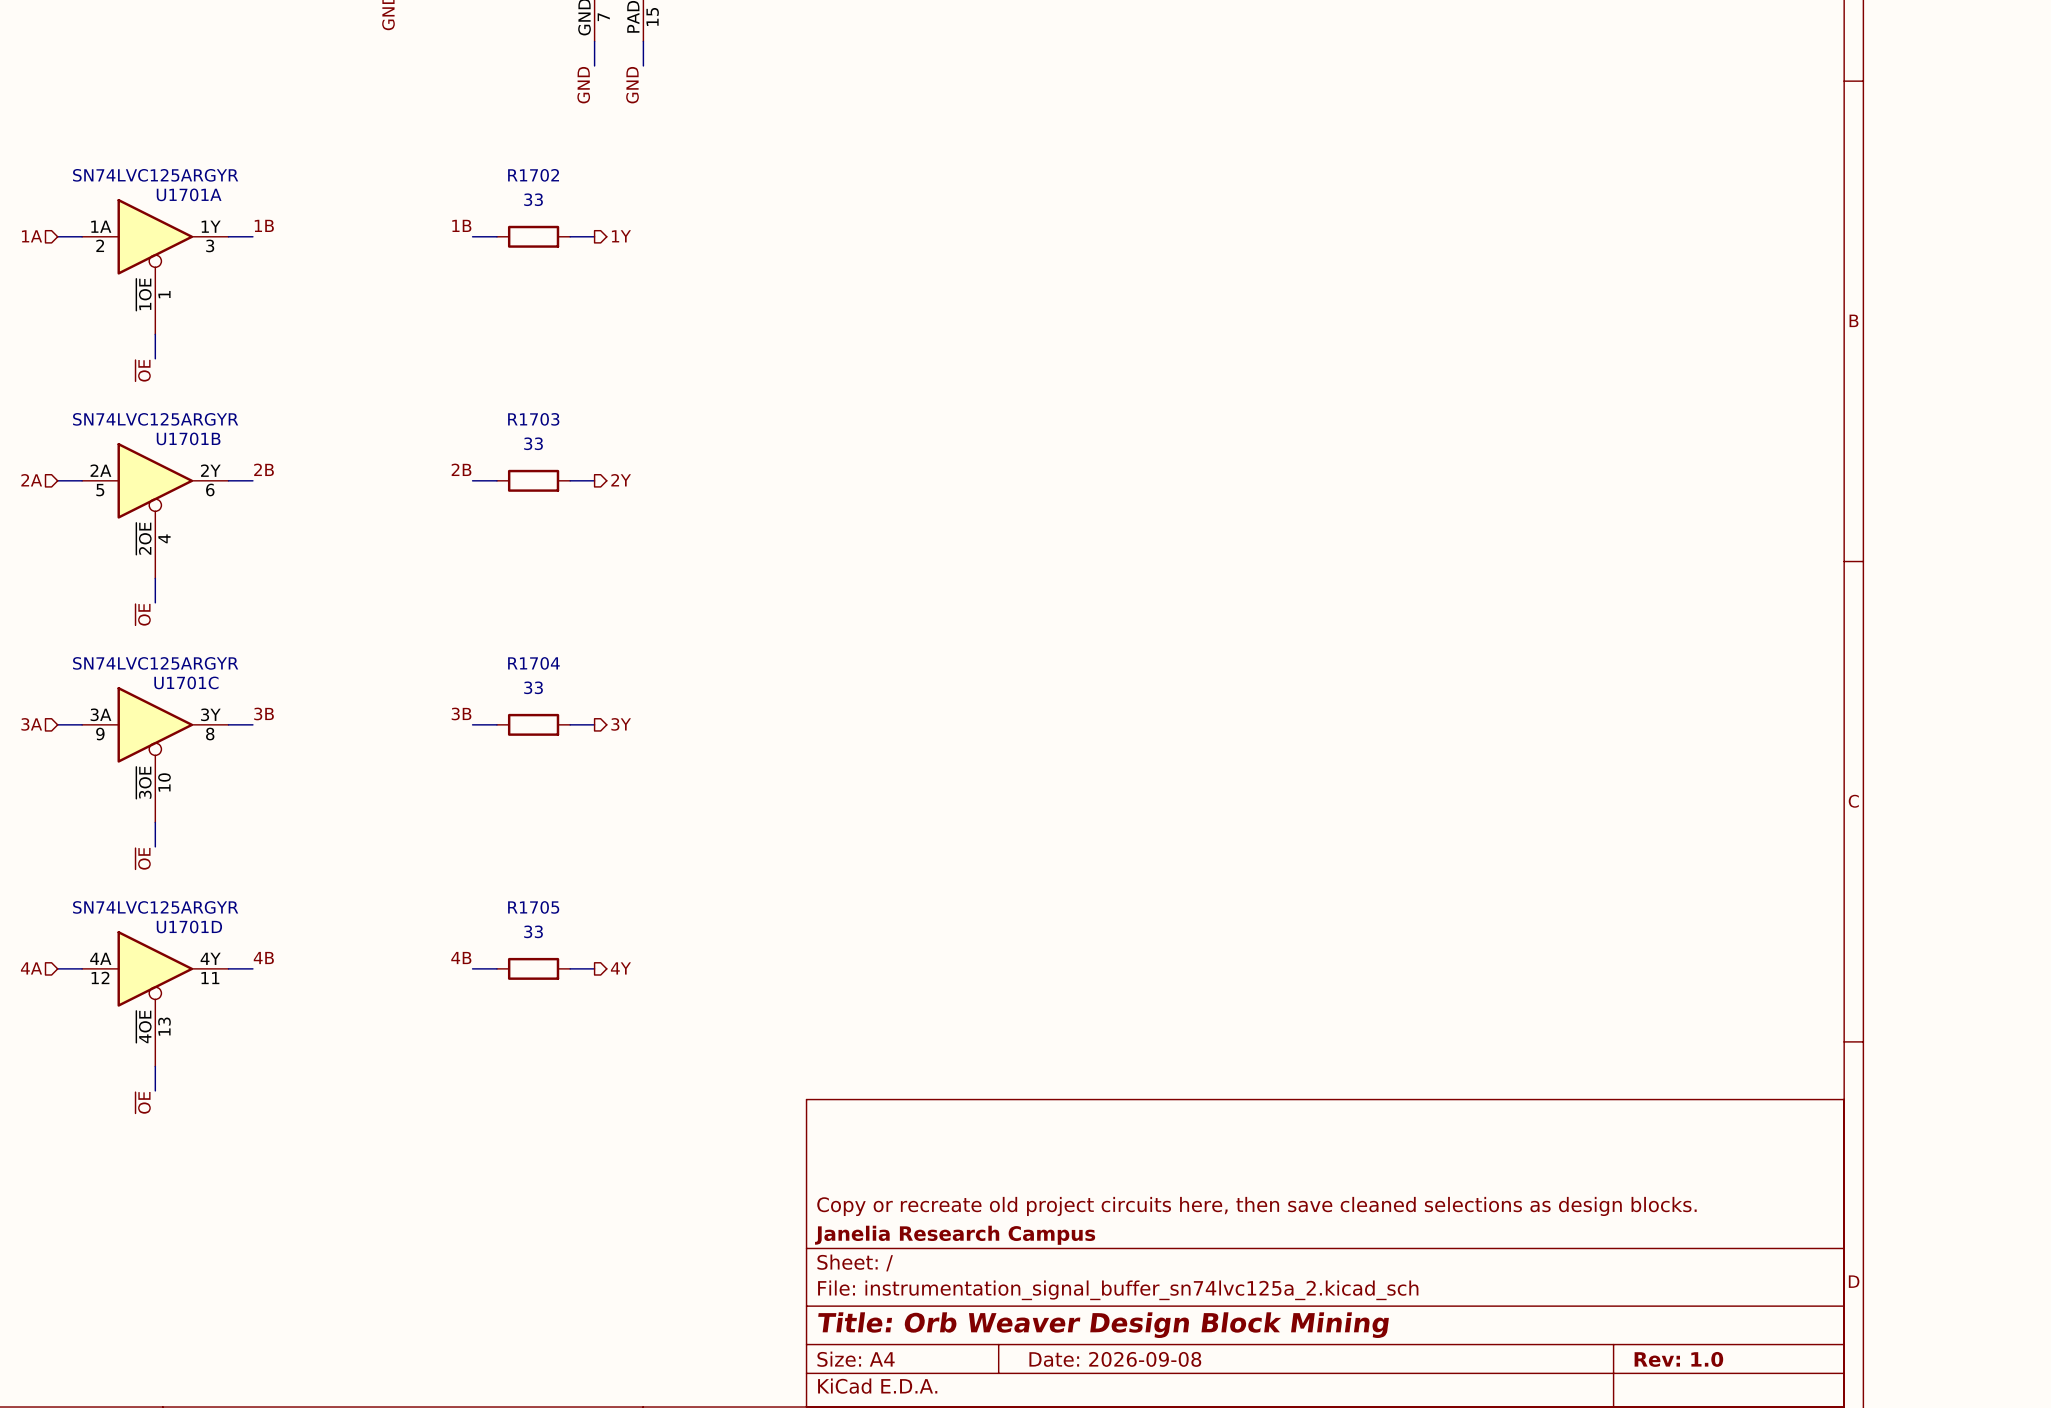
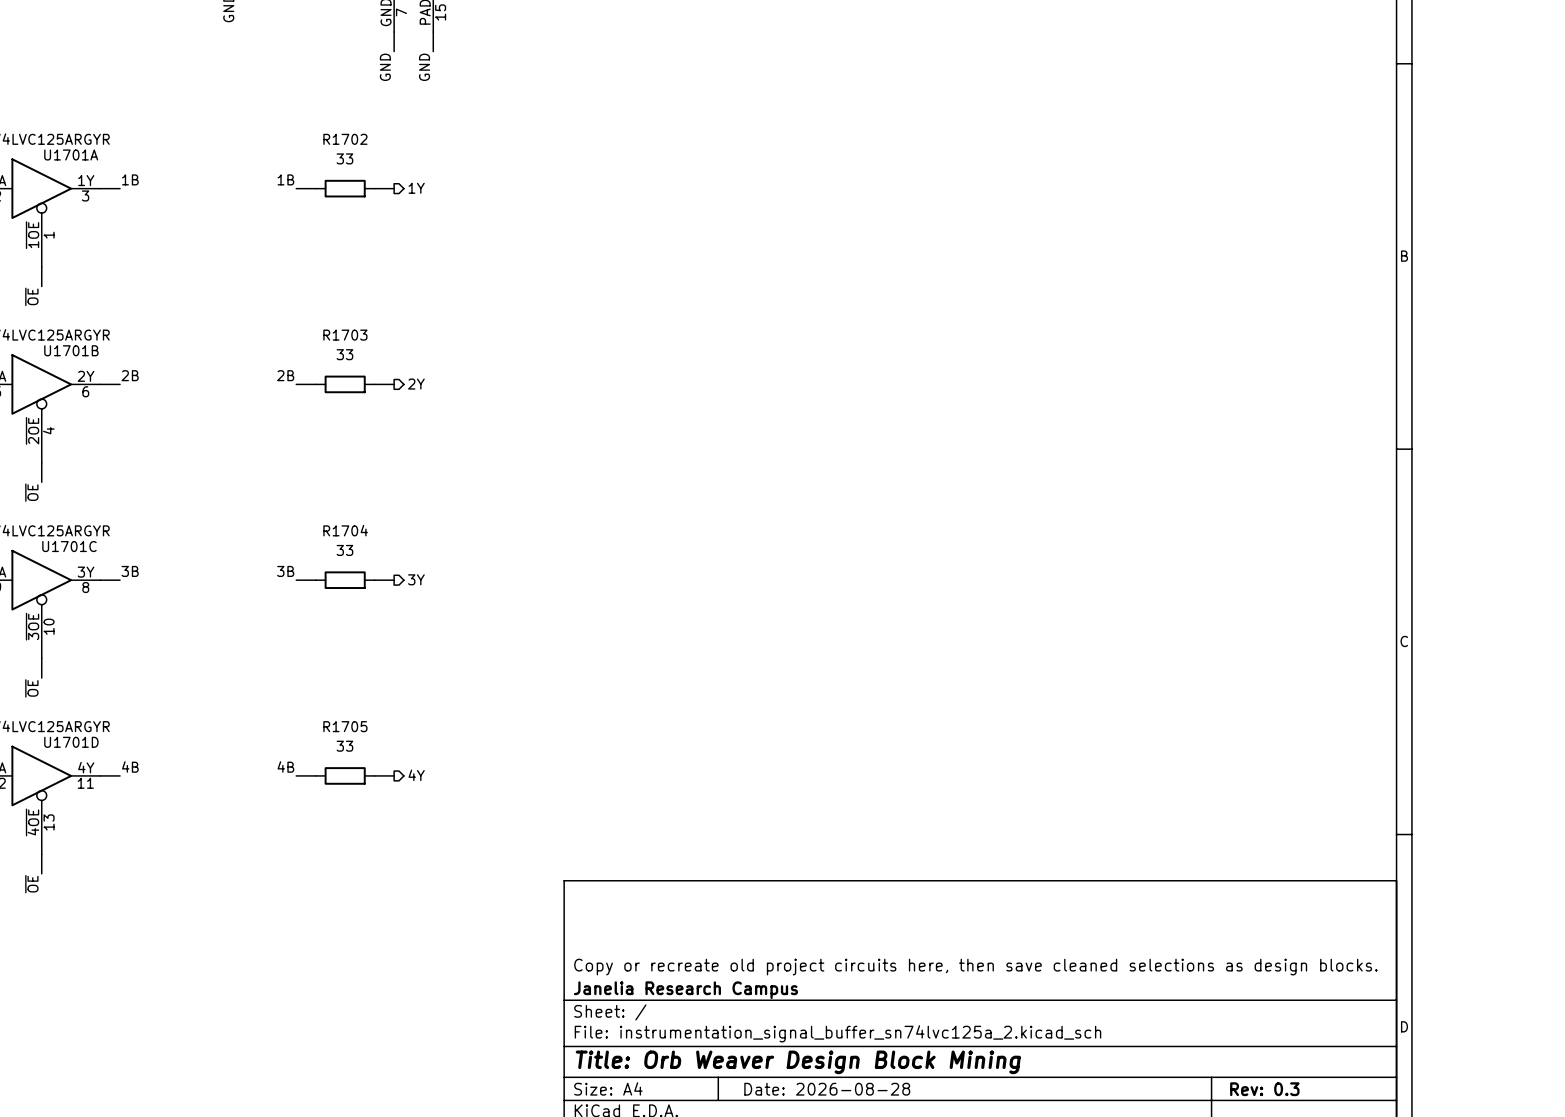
title block: Date: 2026-09-08 (1115, 1359) -> Date: 2026-08-28 (827, 1089)
title block: Rev: 1.0 (1678, 1359) -> Rev: 0.3 (1264, 1089)

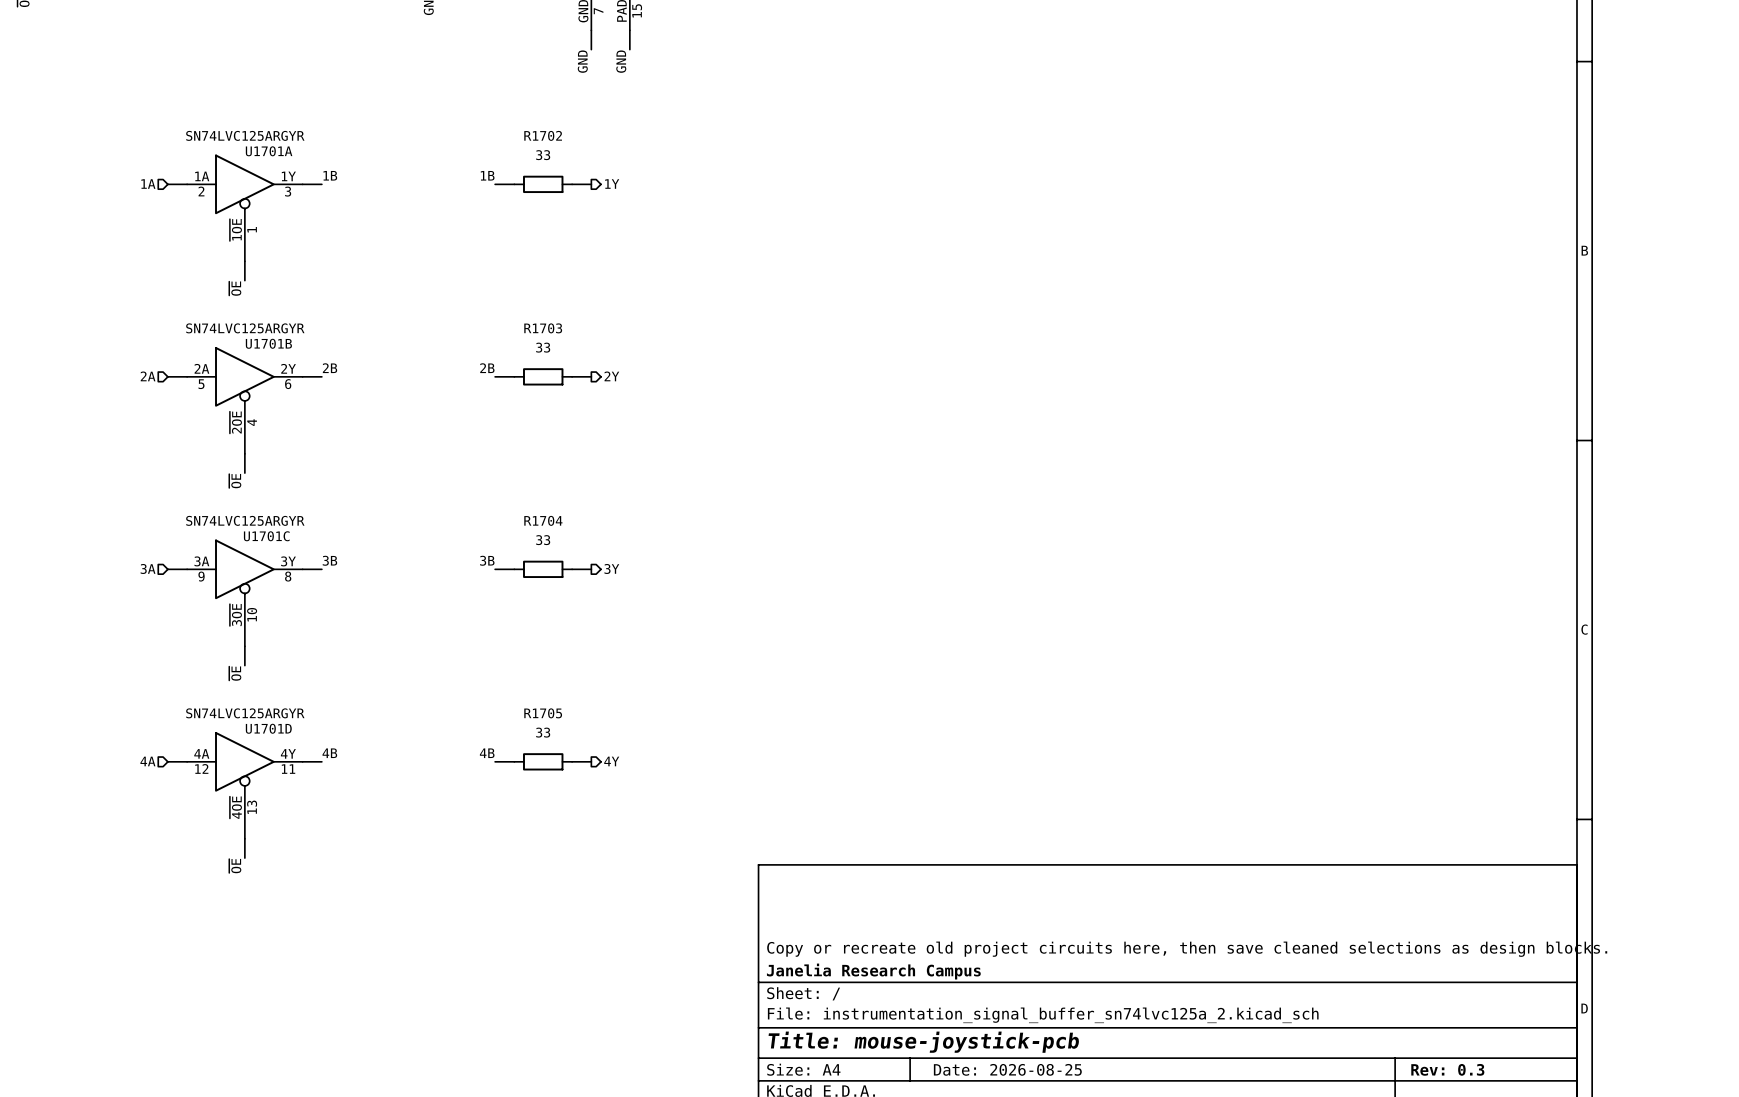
title block: Title: Orb Weaver Design Block Mining (798, 1062) -> Title: mouse-joystick-pcb (923, 1042)
title block: Date: 2026-08-28 (827, 1089) -> Date: 2026-08-25 (1007, 1069)

